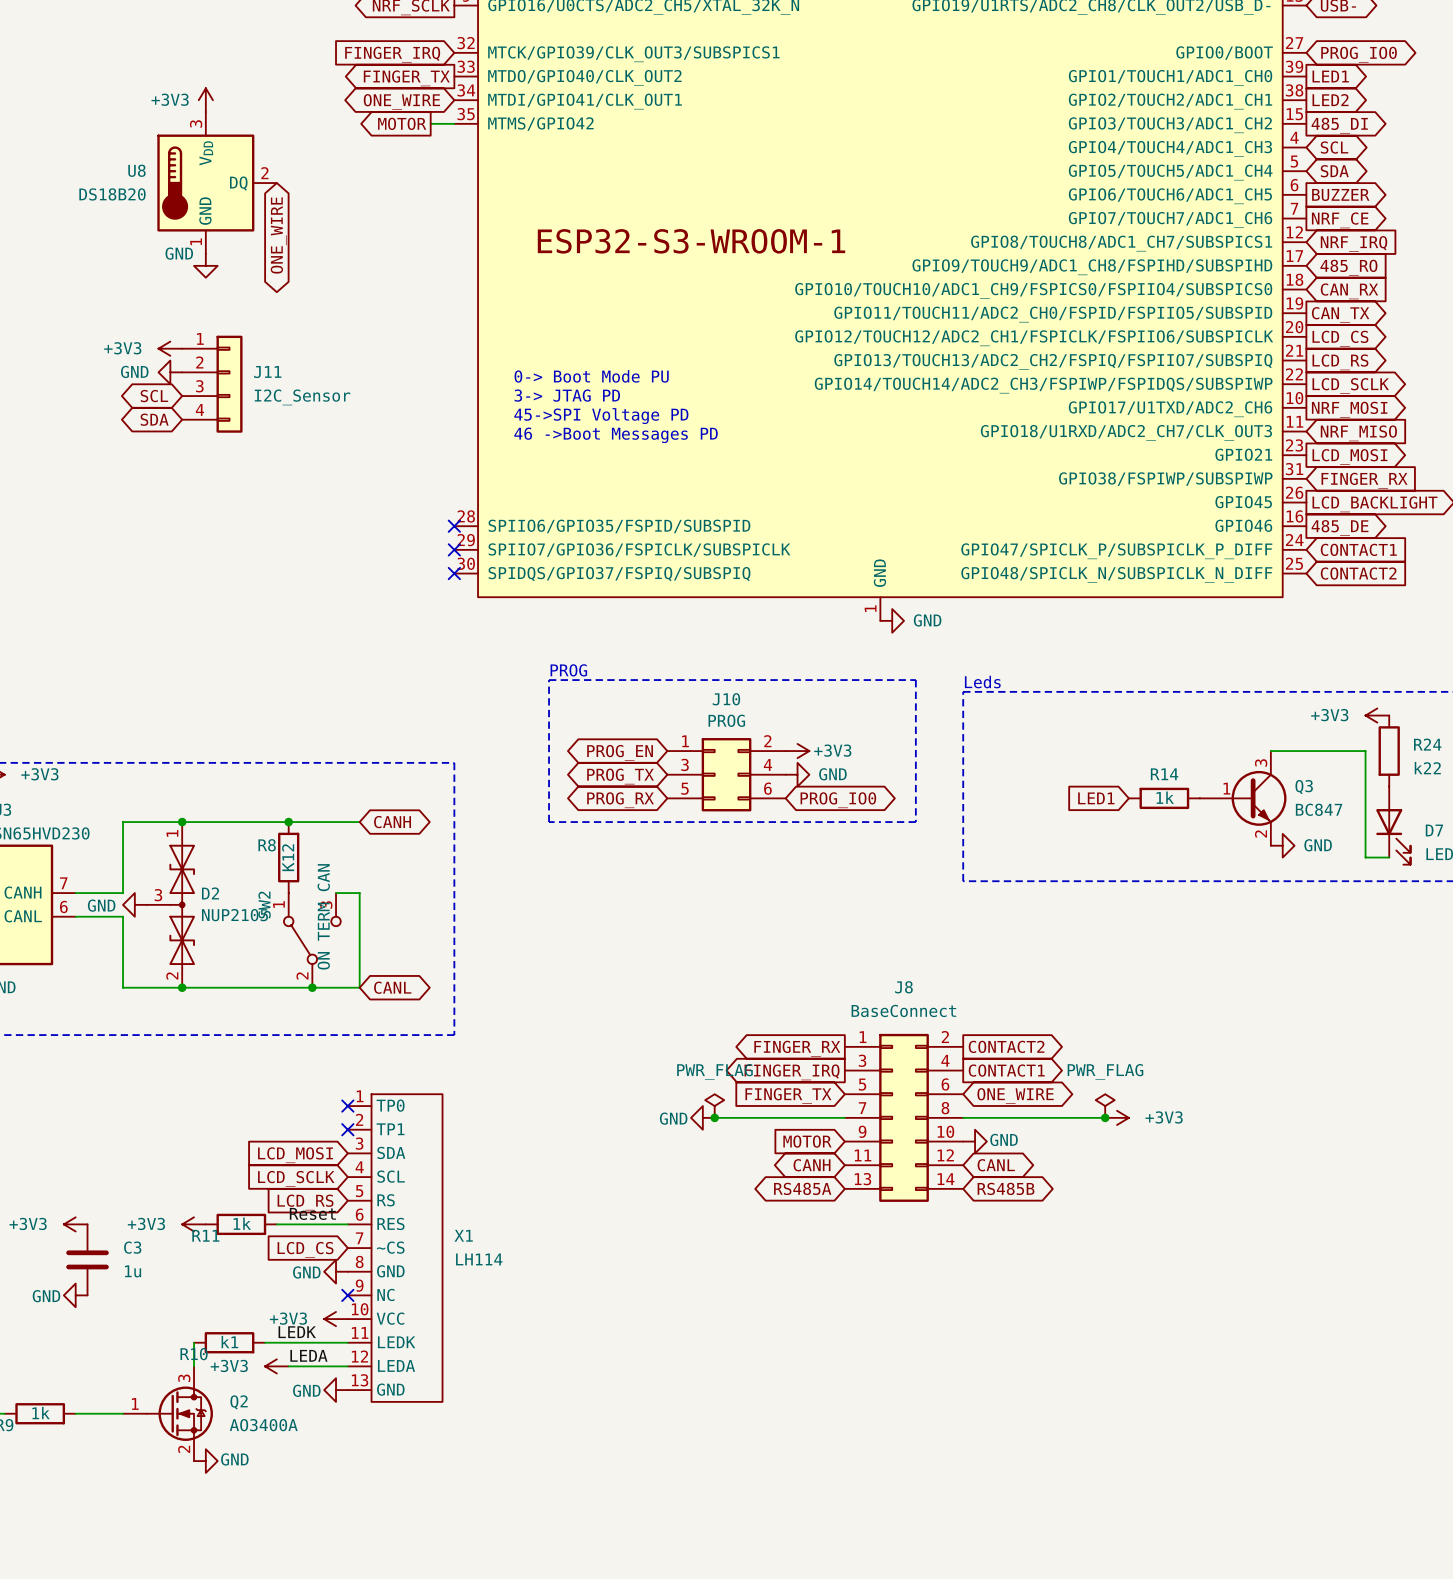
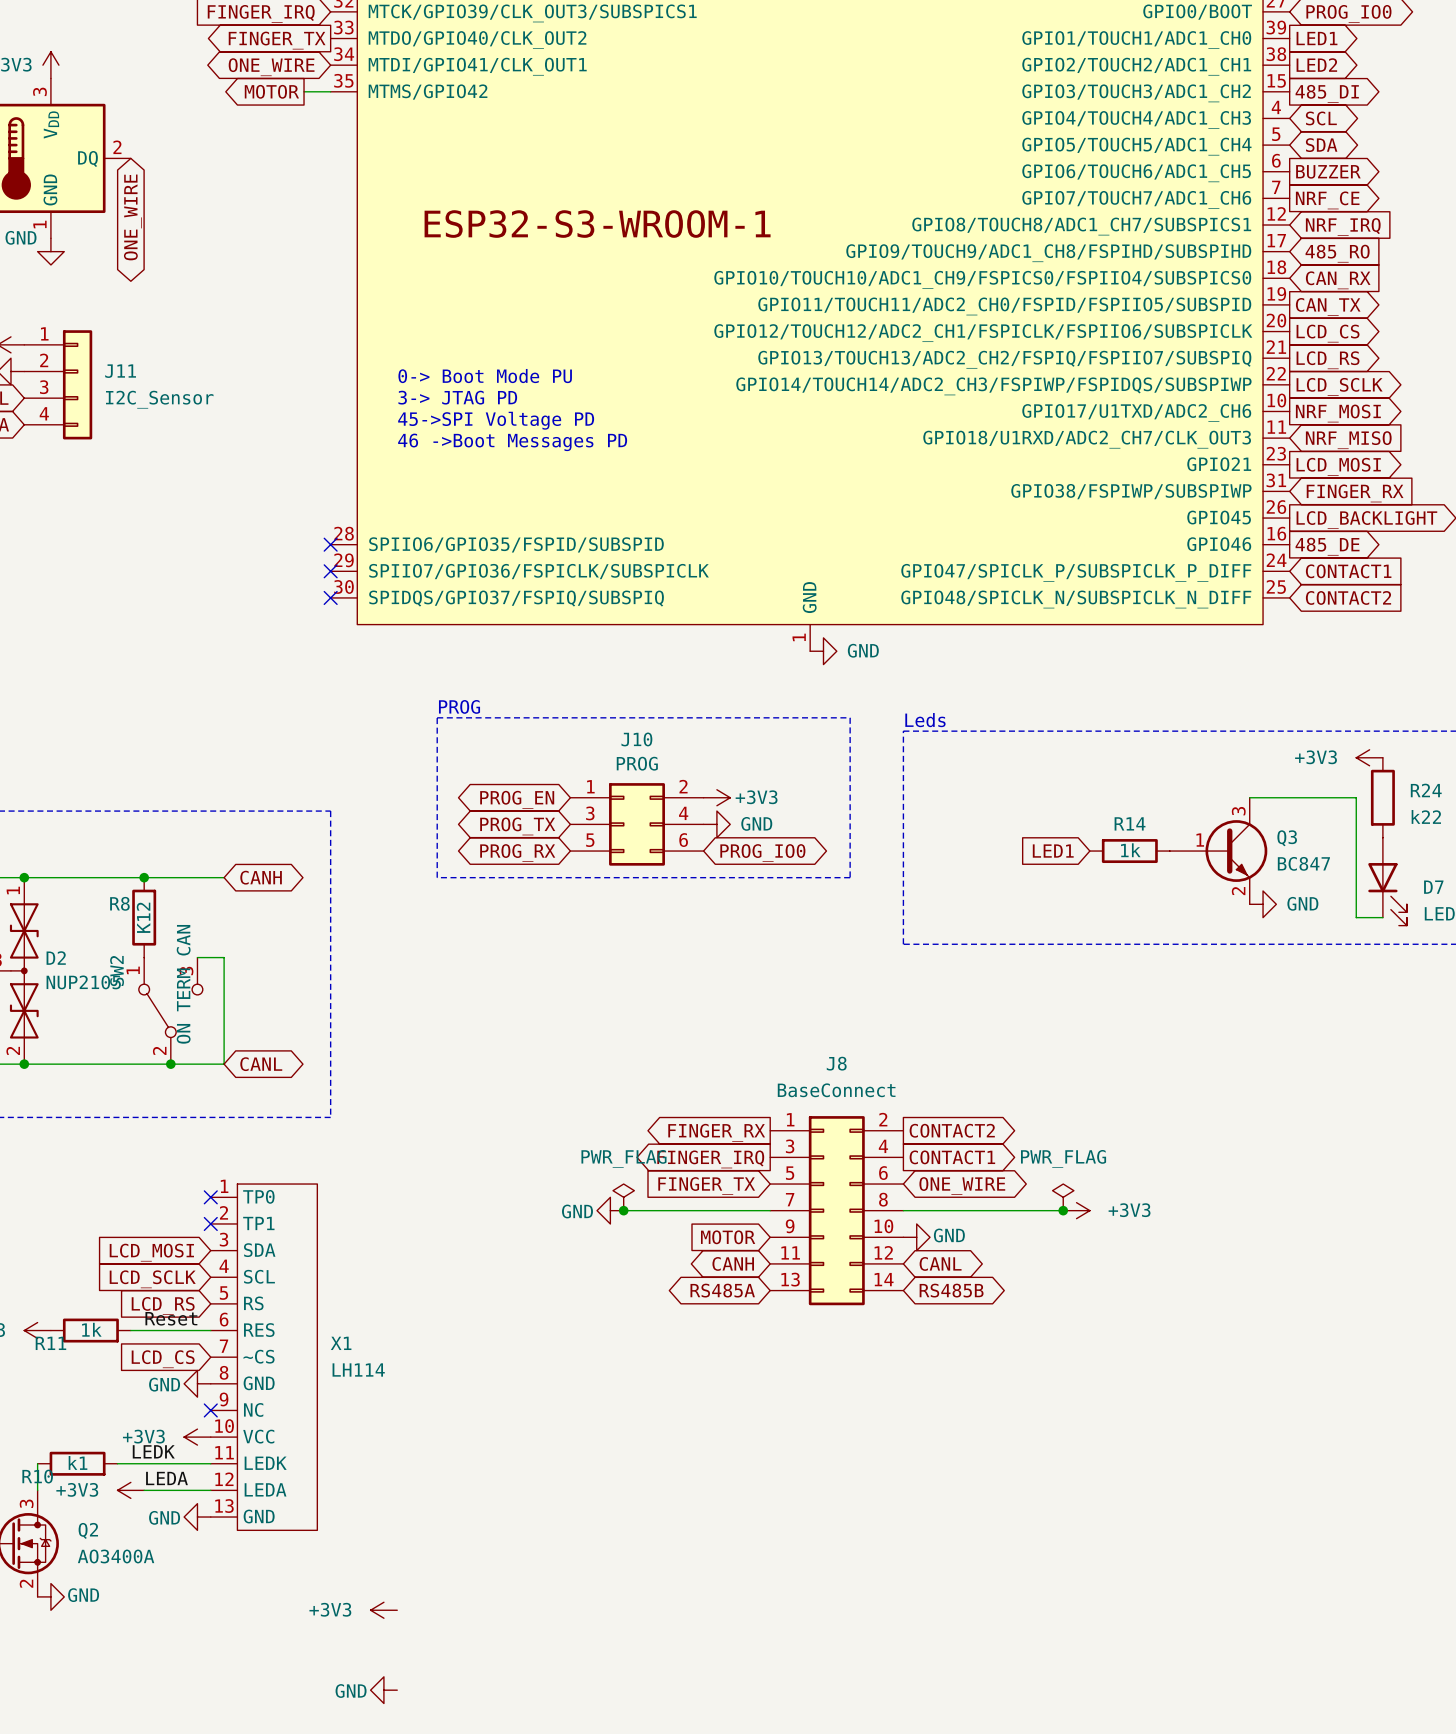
power symbol: none -> +3V3 (383, 1610)
power symbol: none -> GND (383, 1690)

